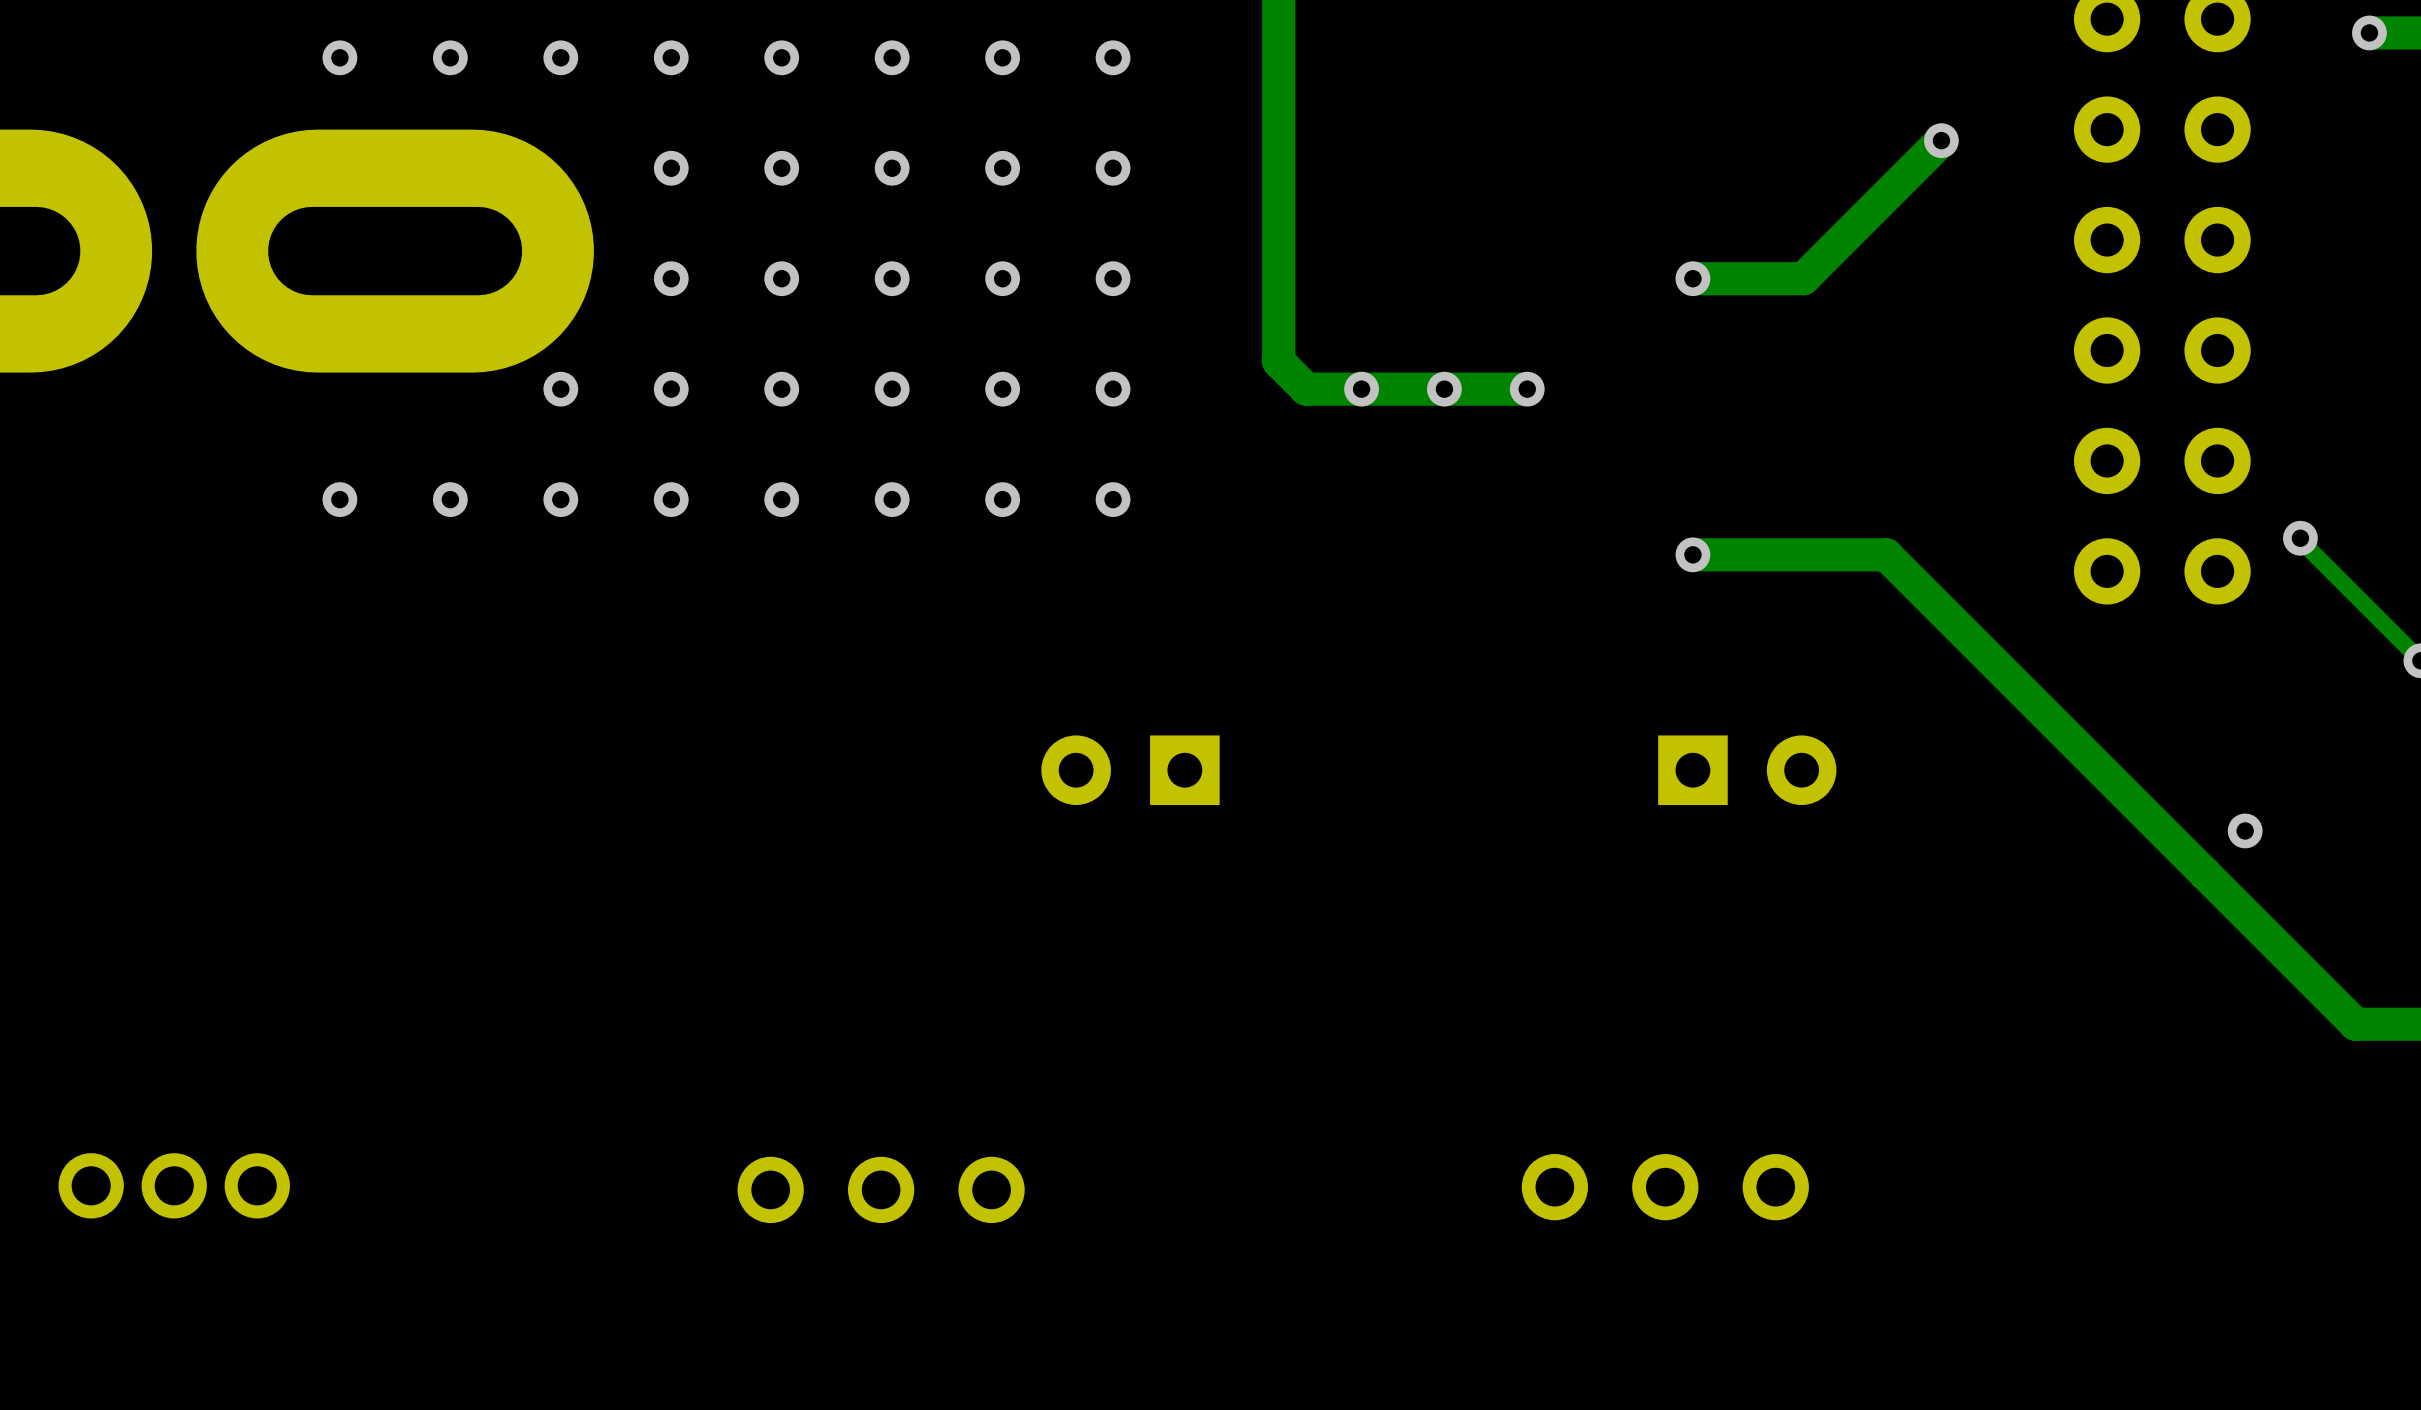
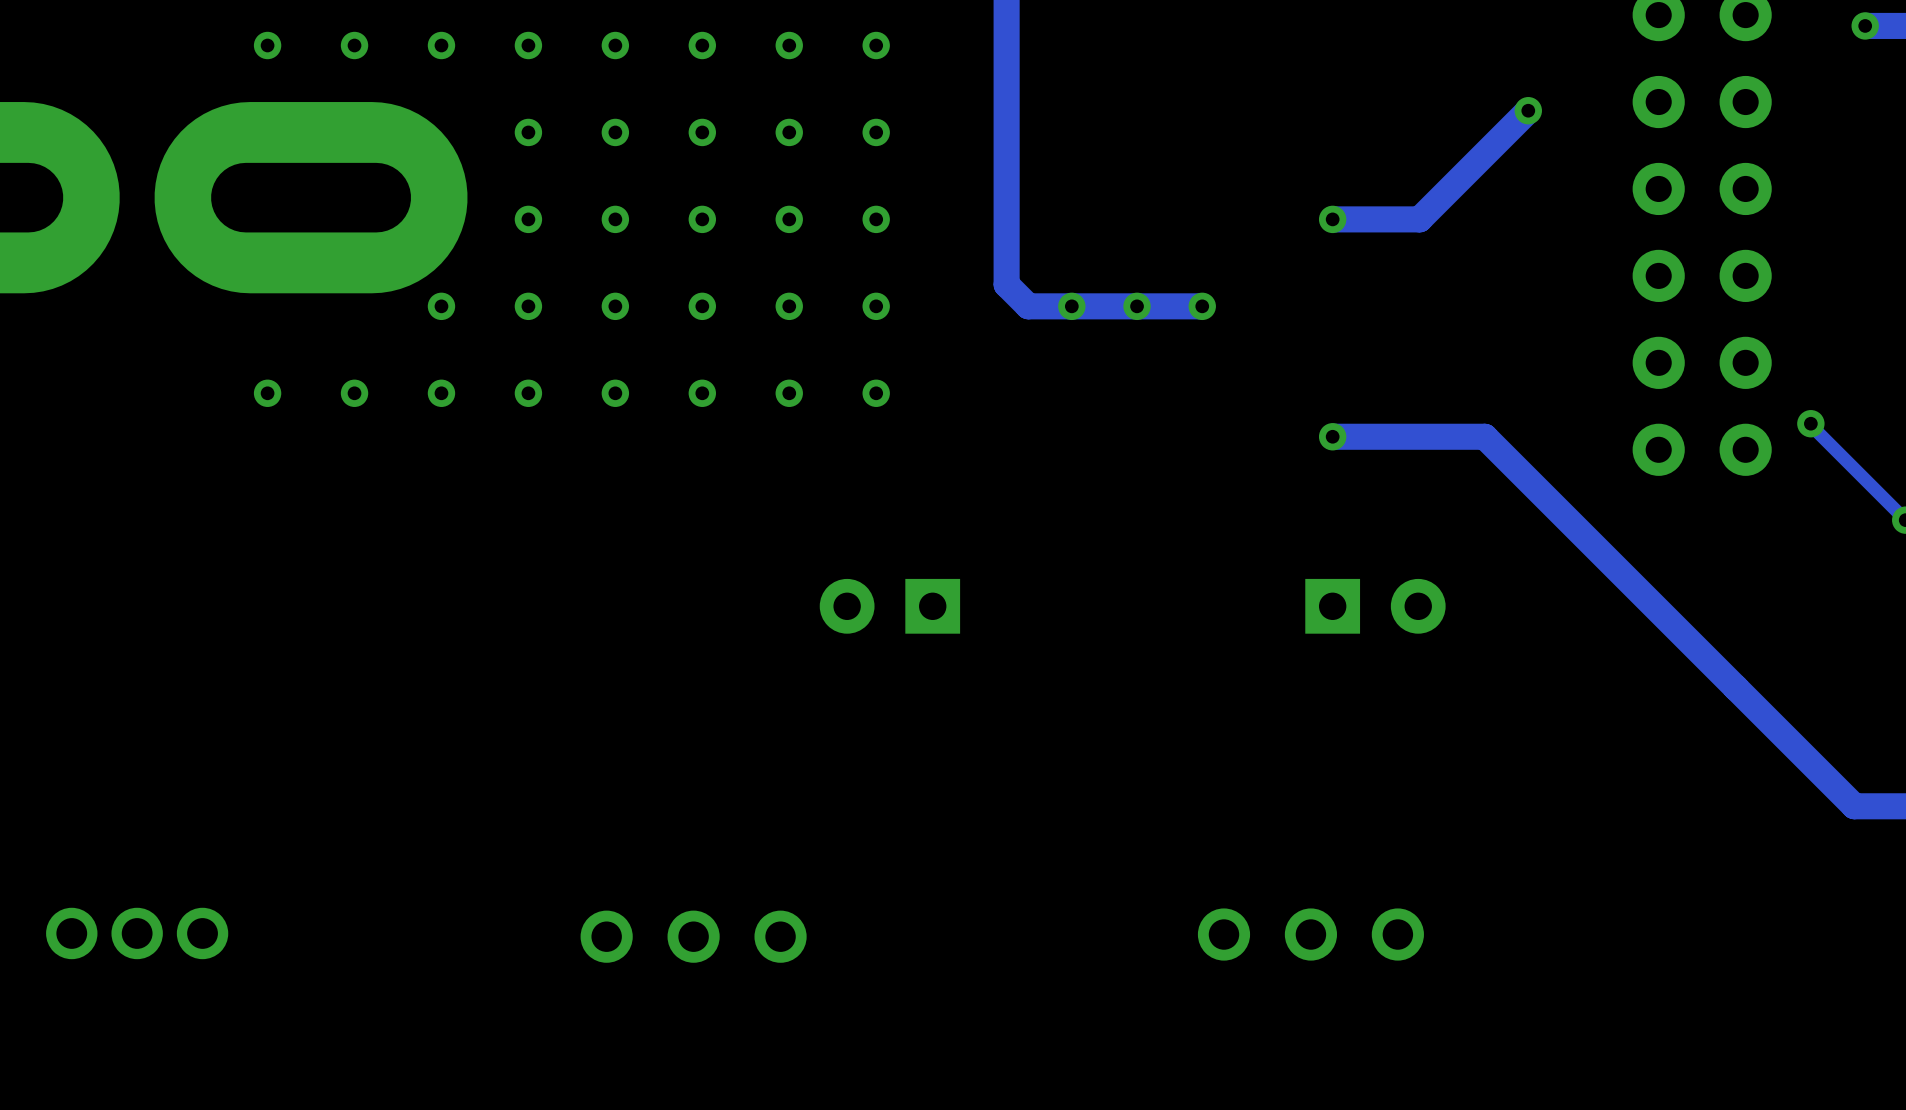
via: (2245, 830) -> none

